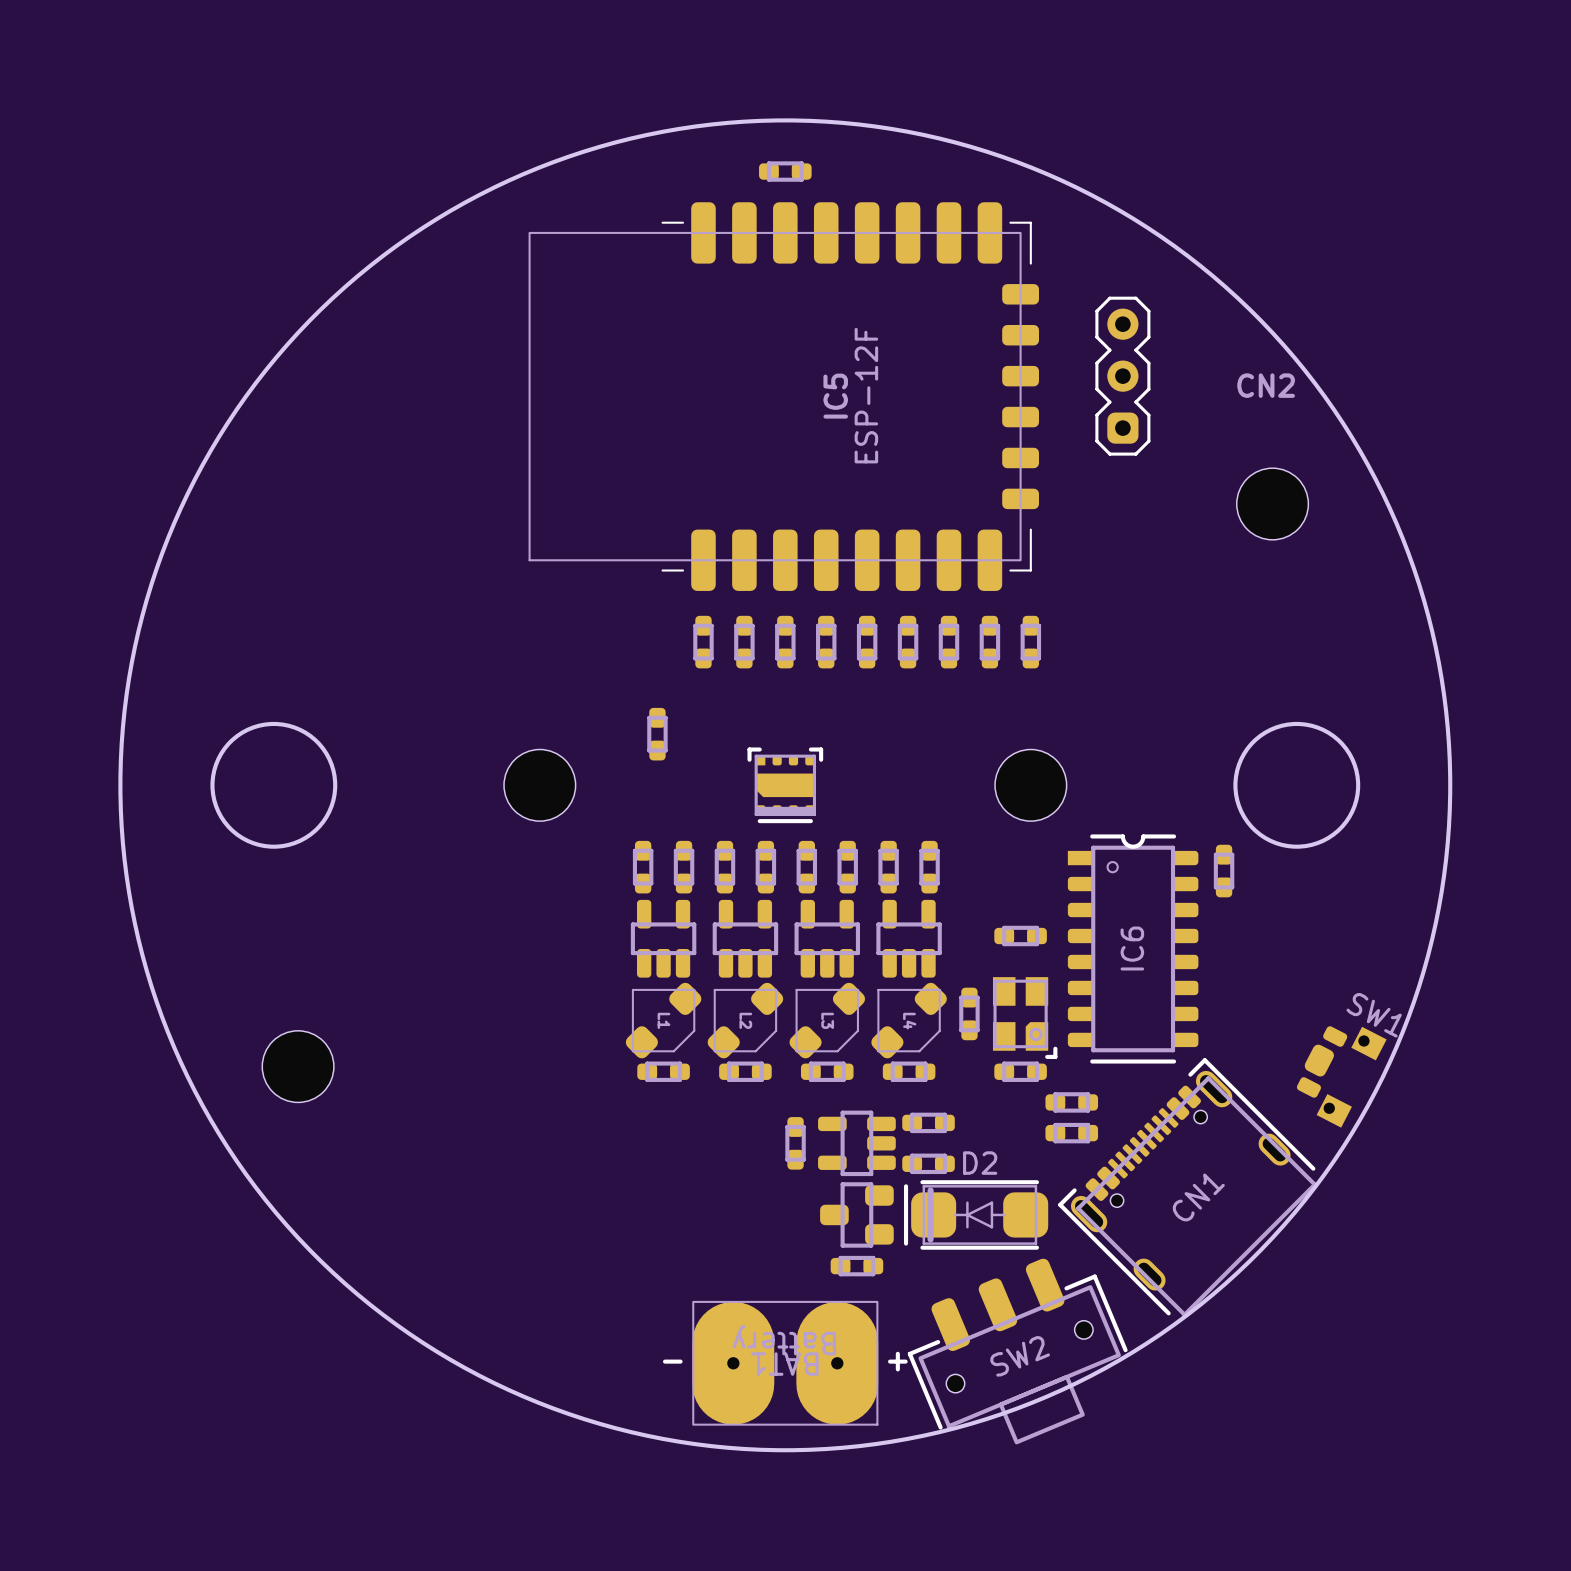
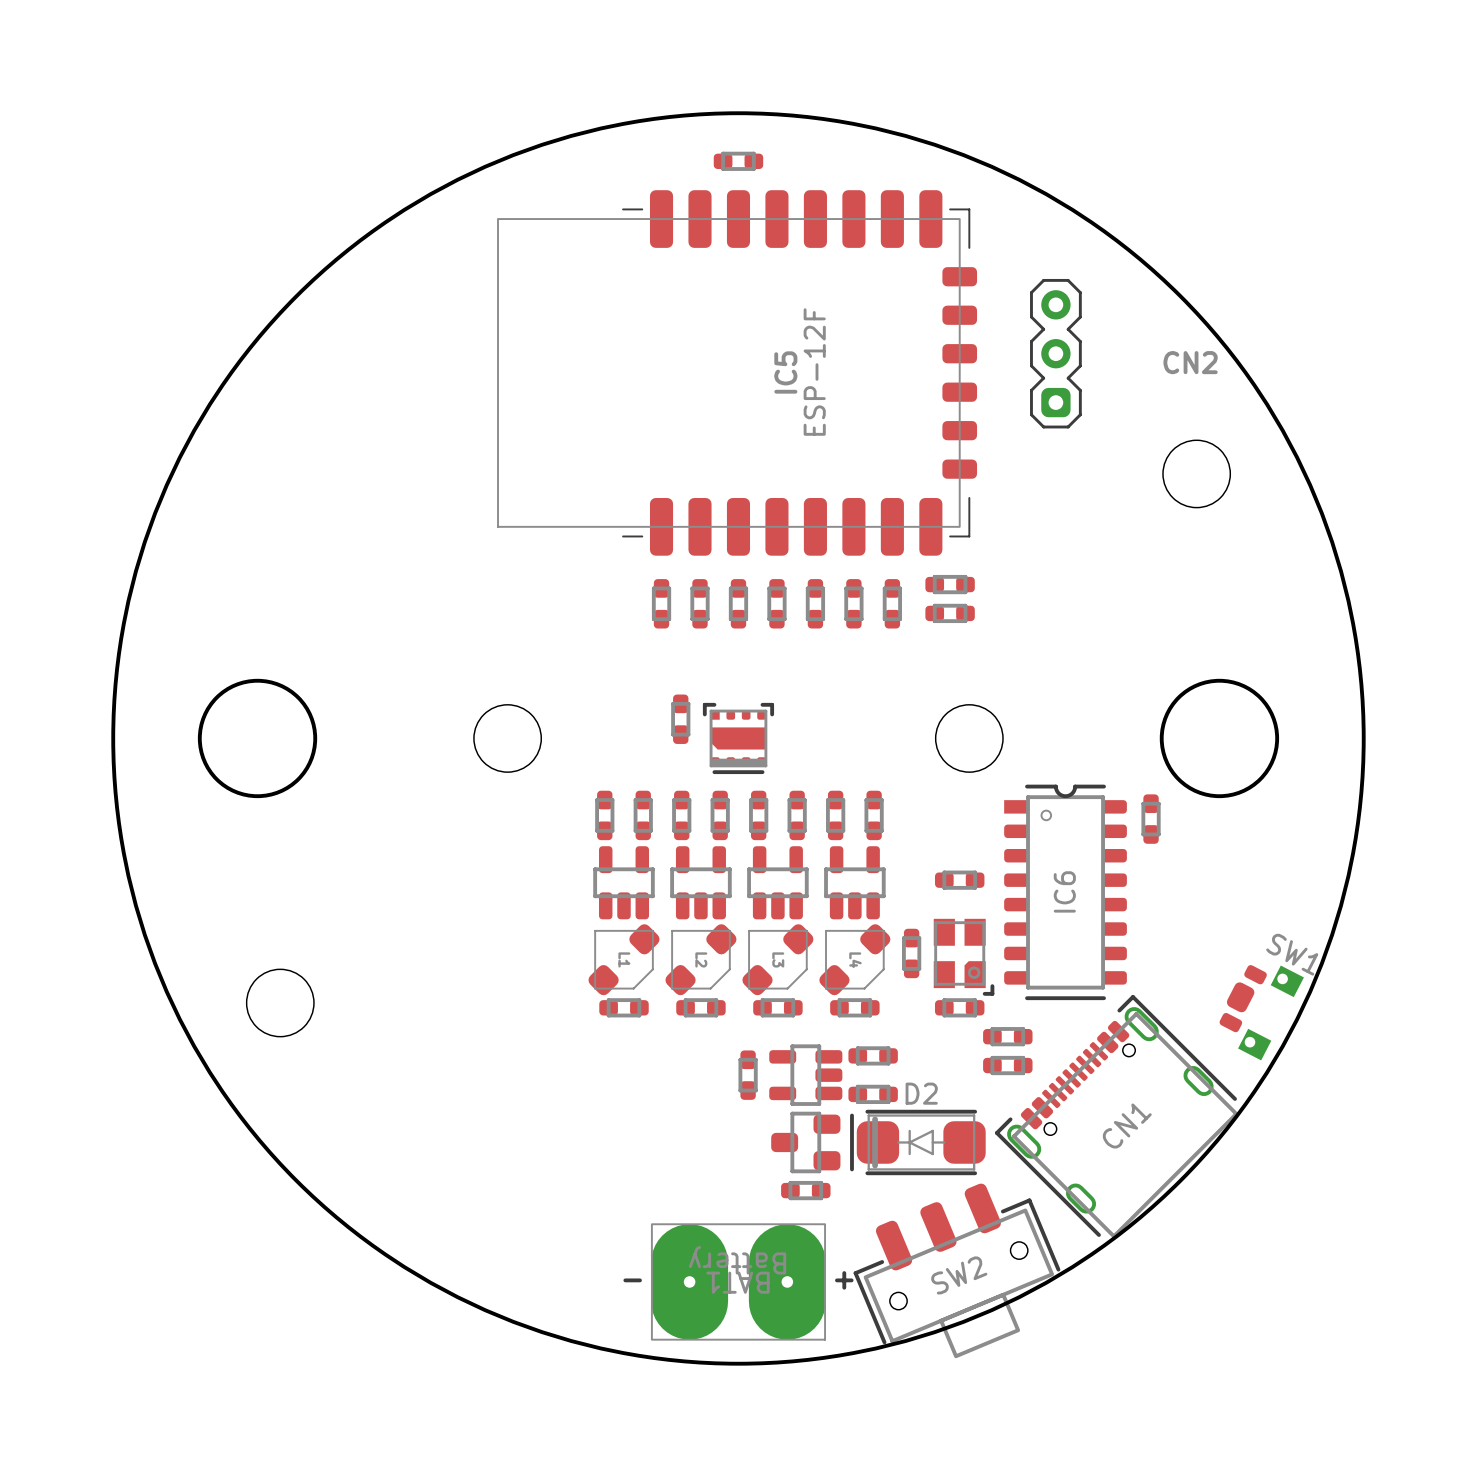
part: none -> (950, 584)
part: (989, 642) -> none
part: (1030, 642) -> none
part: none -> (950, 613)
part position: (657, 734) -> (680, 719)

